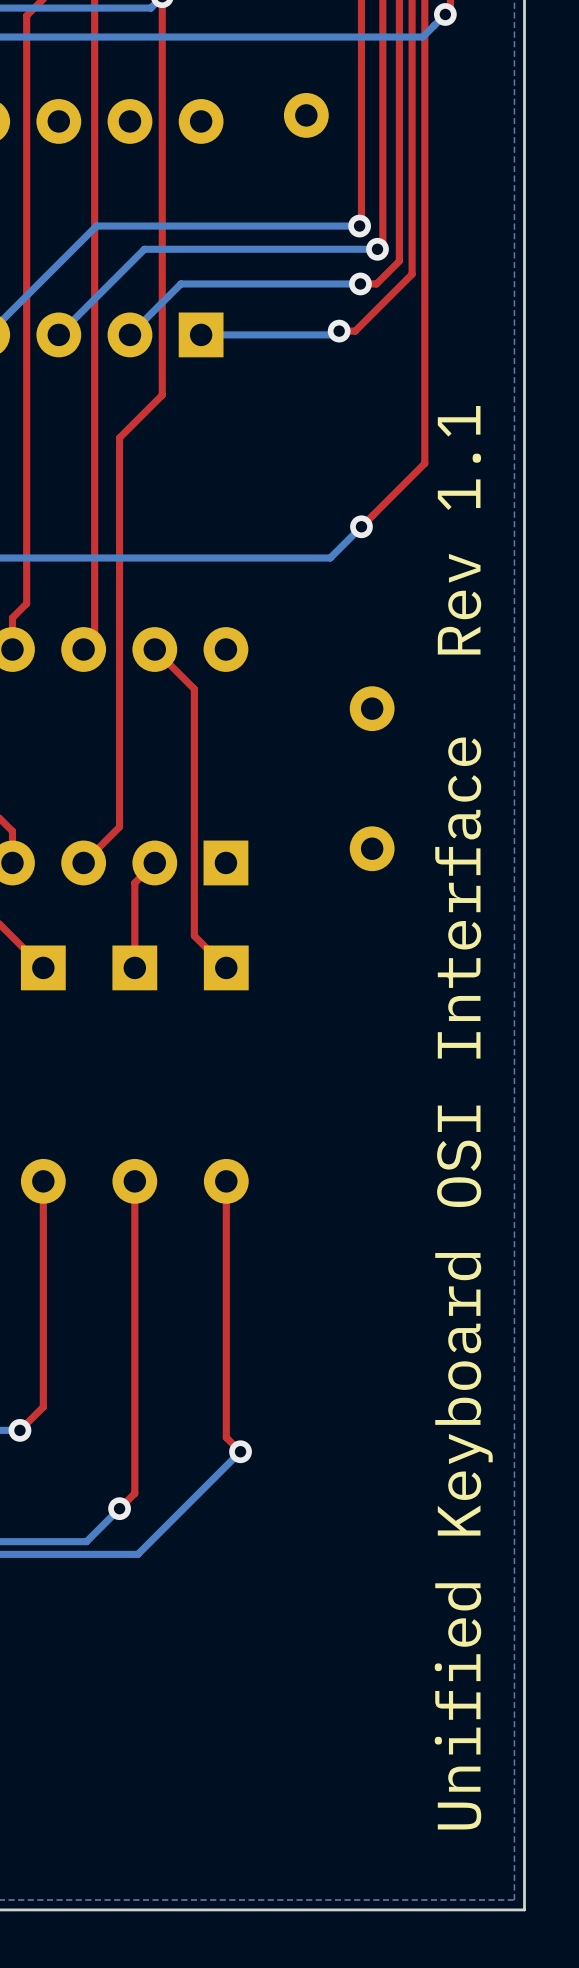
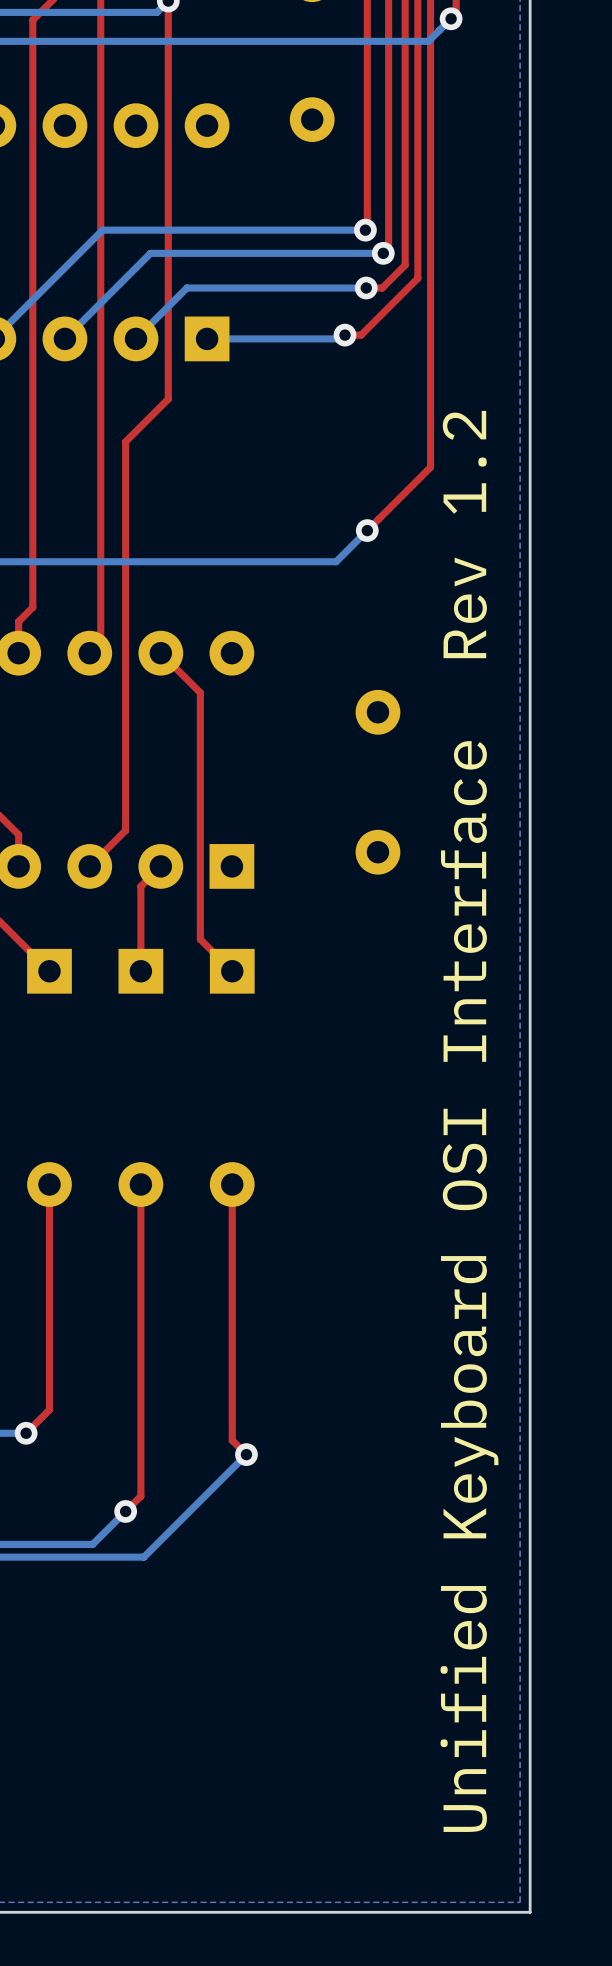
text: Unified Keyboard OSI Interface Rev 1.1 (463, 1117) -> Unified Keyboard OSI Interface Rev 1.2 (469, 1121)

